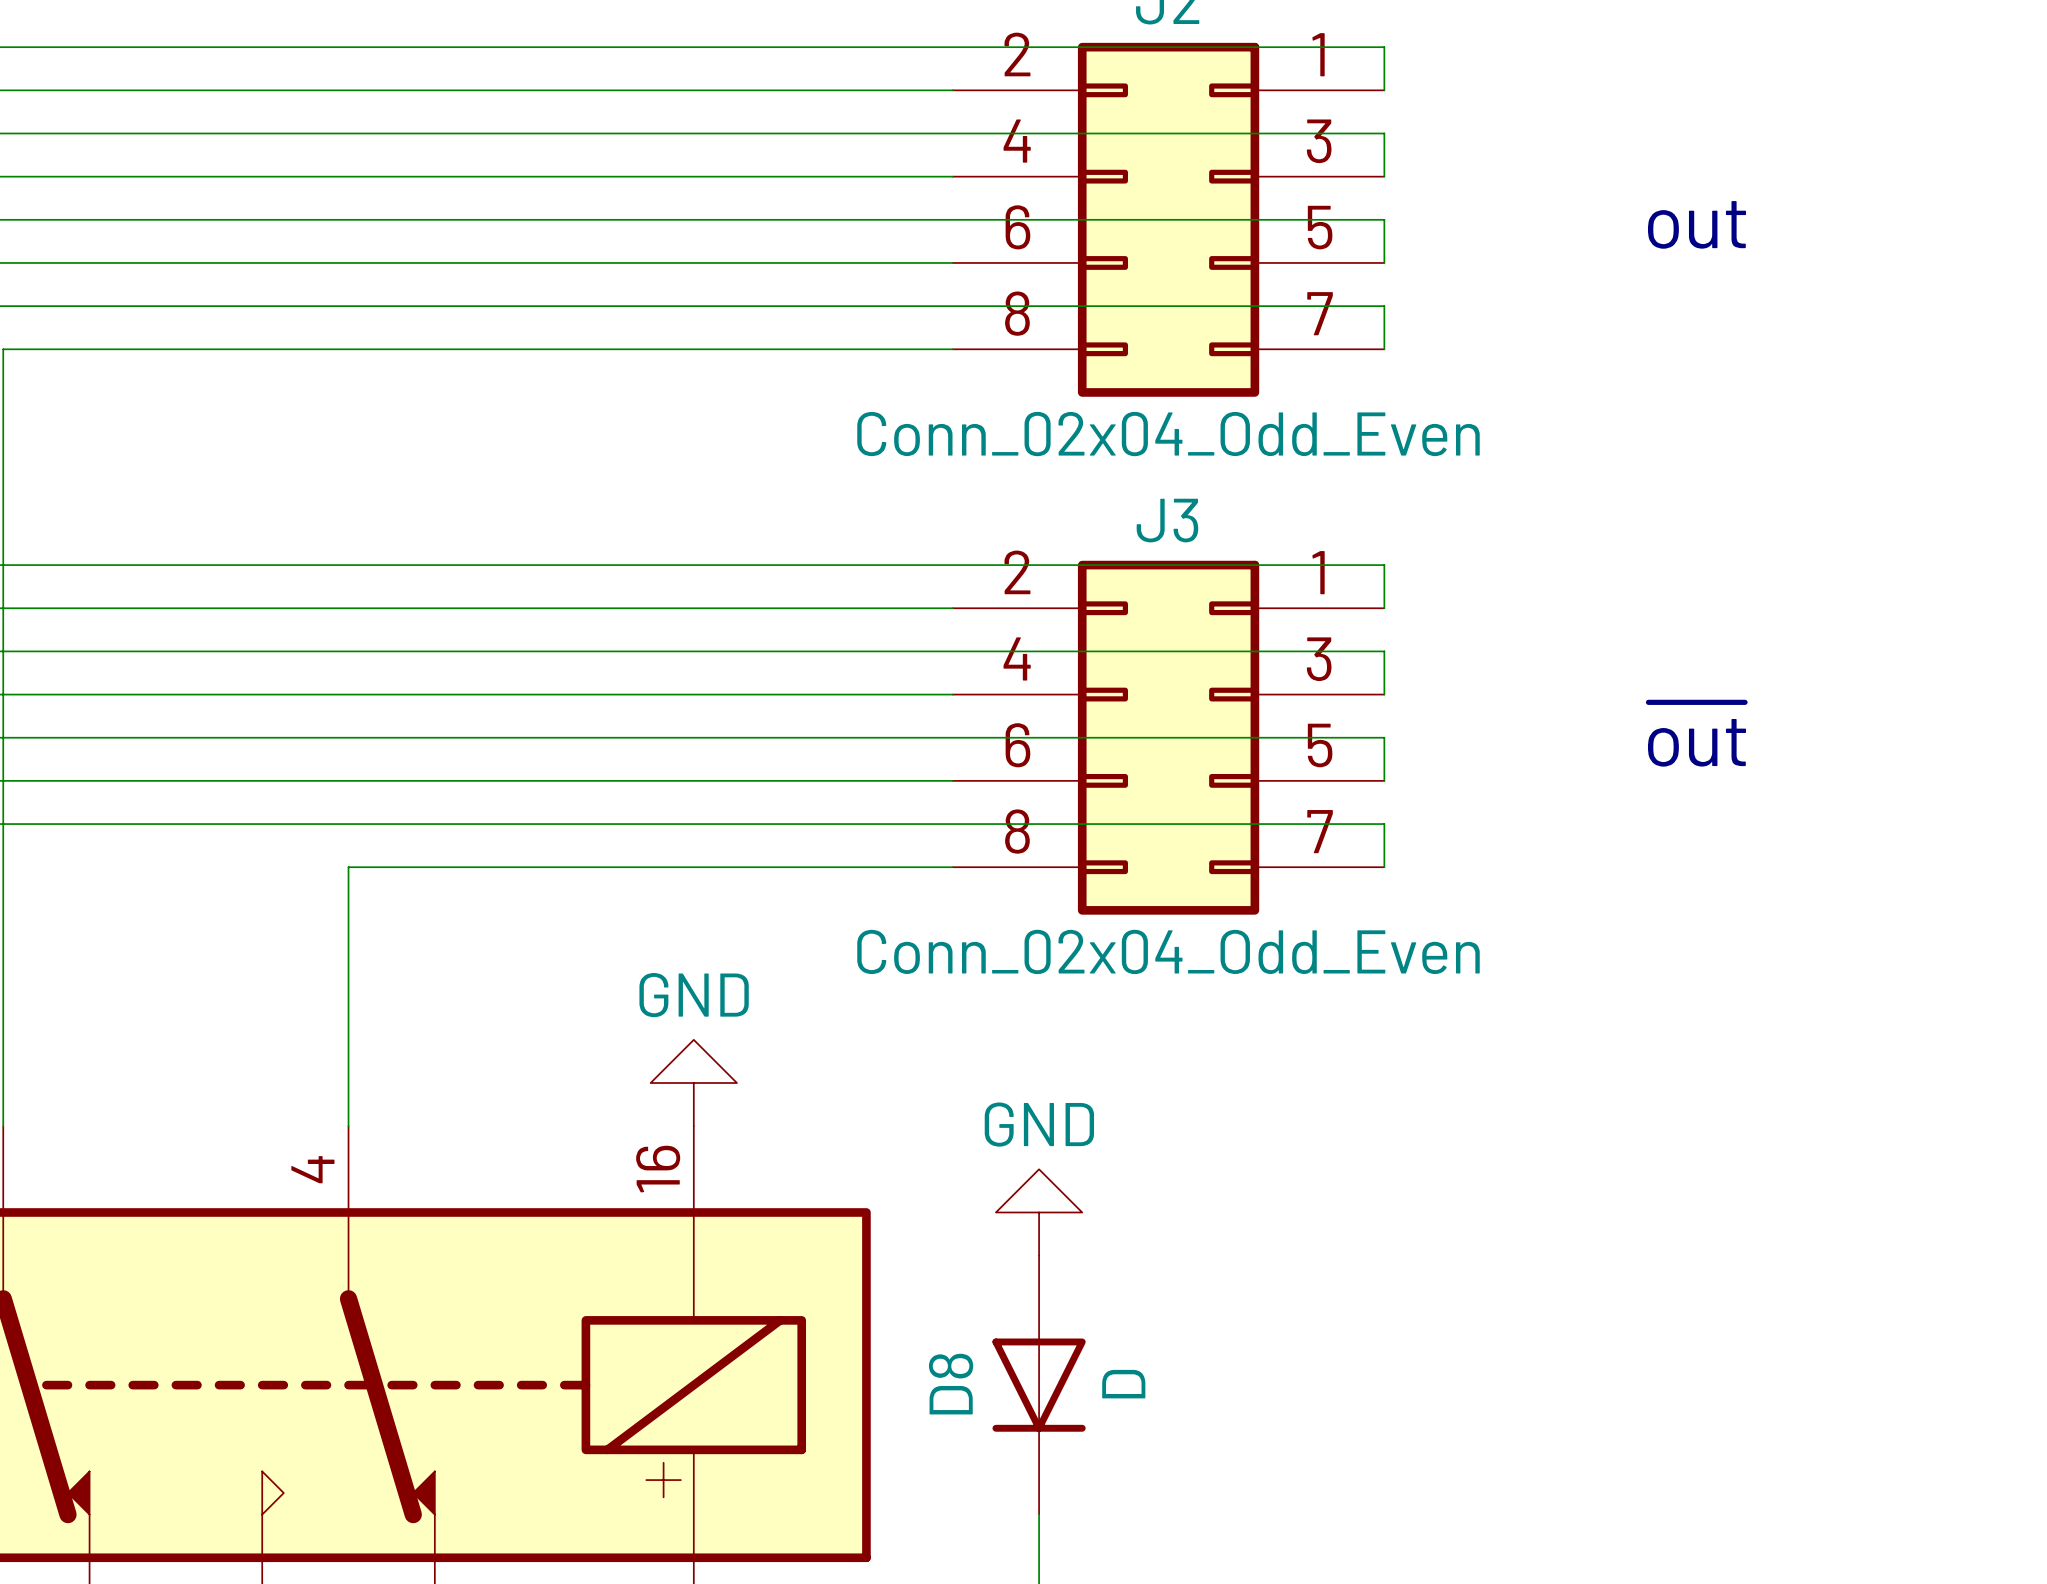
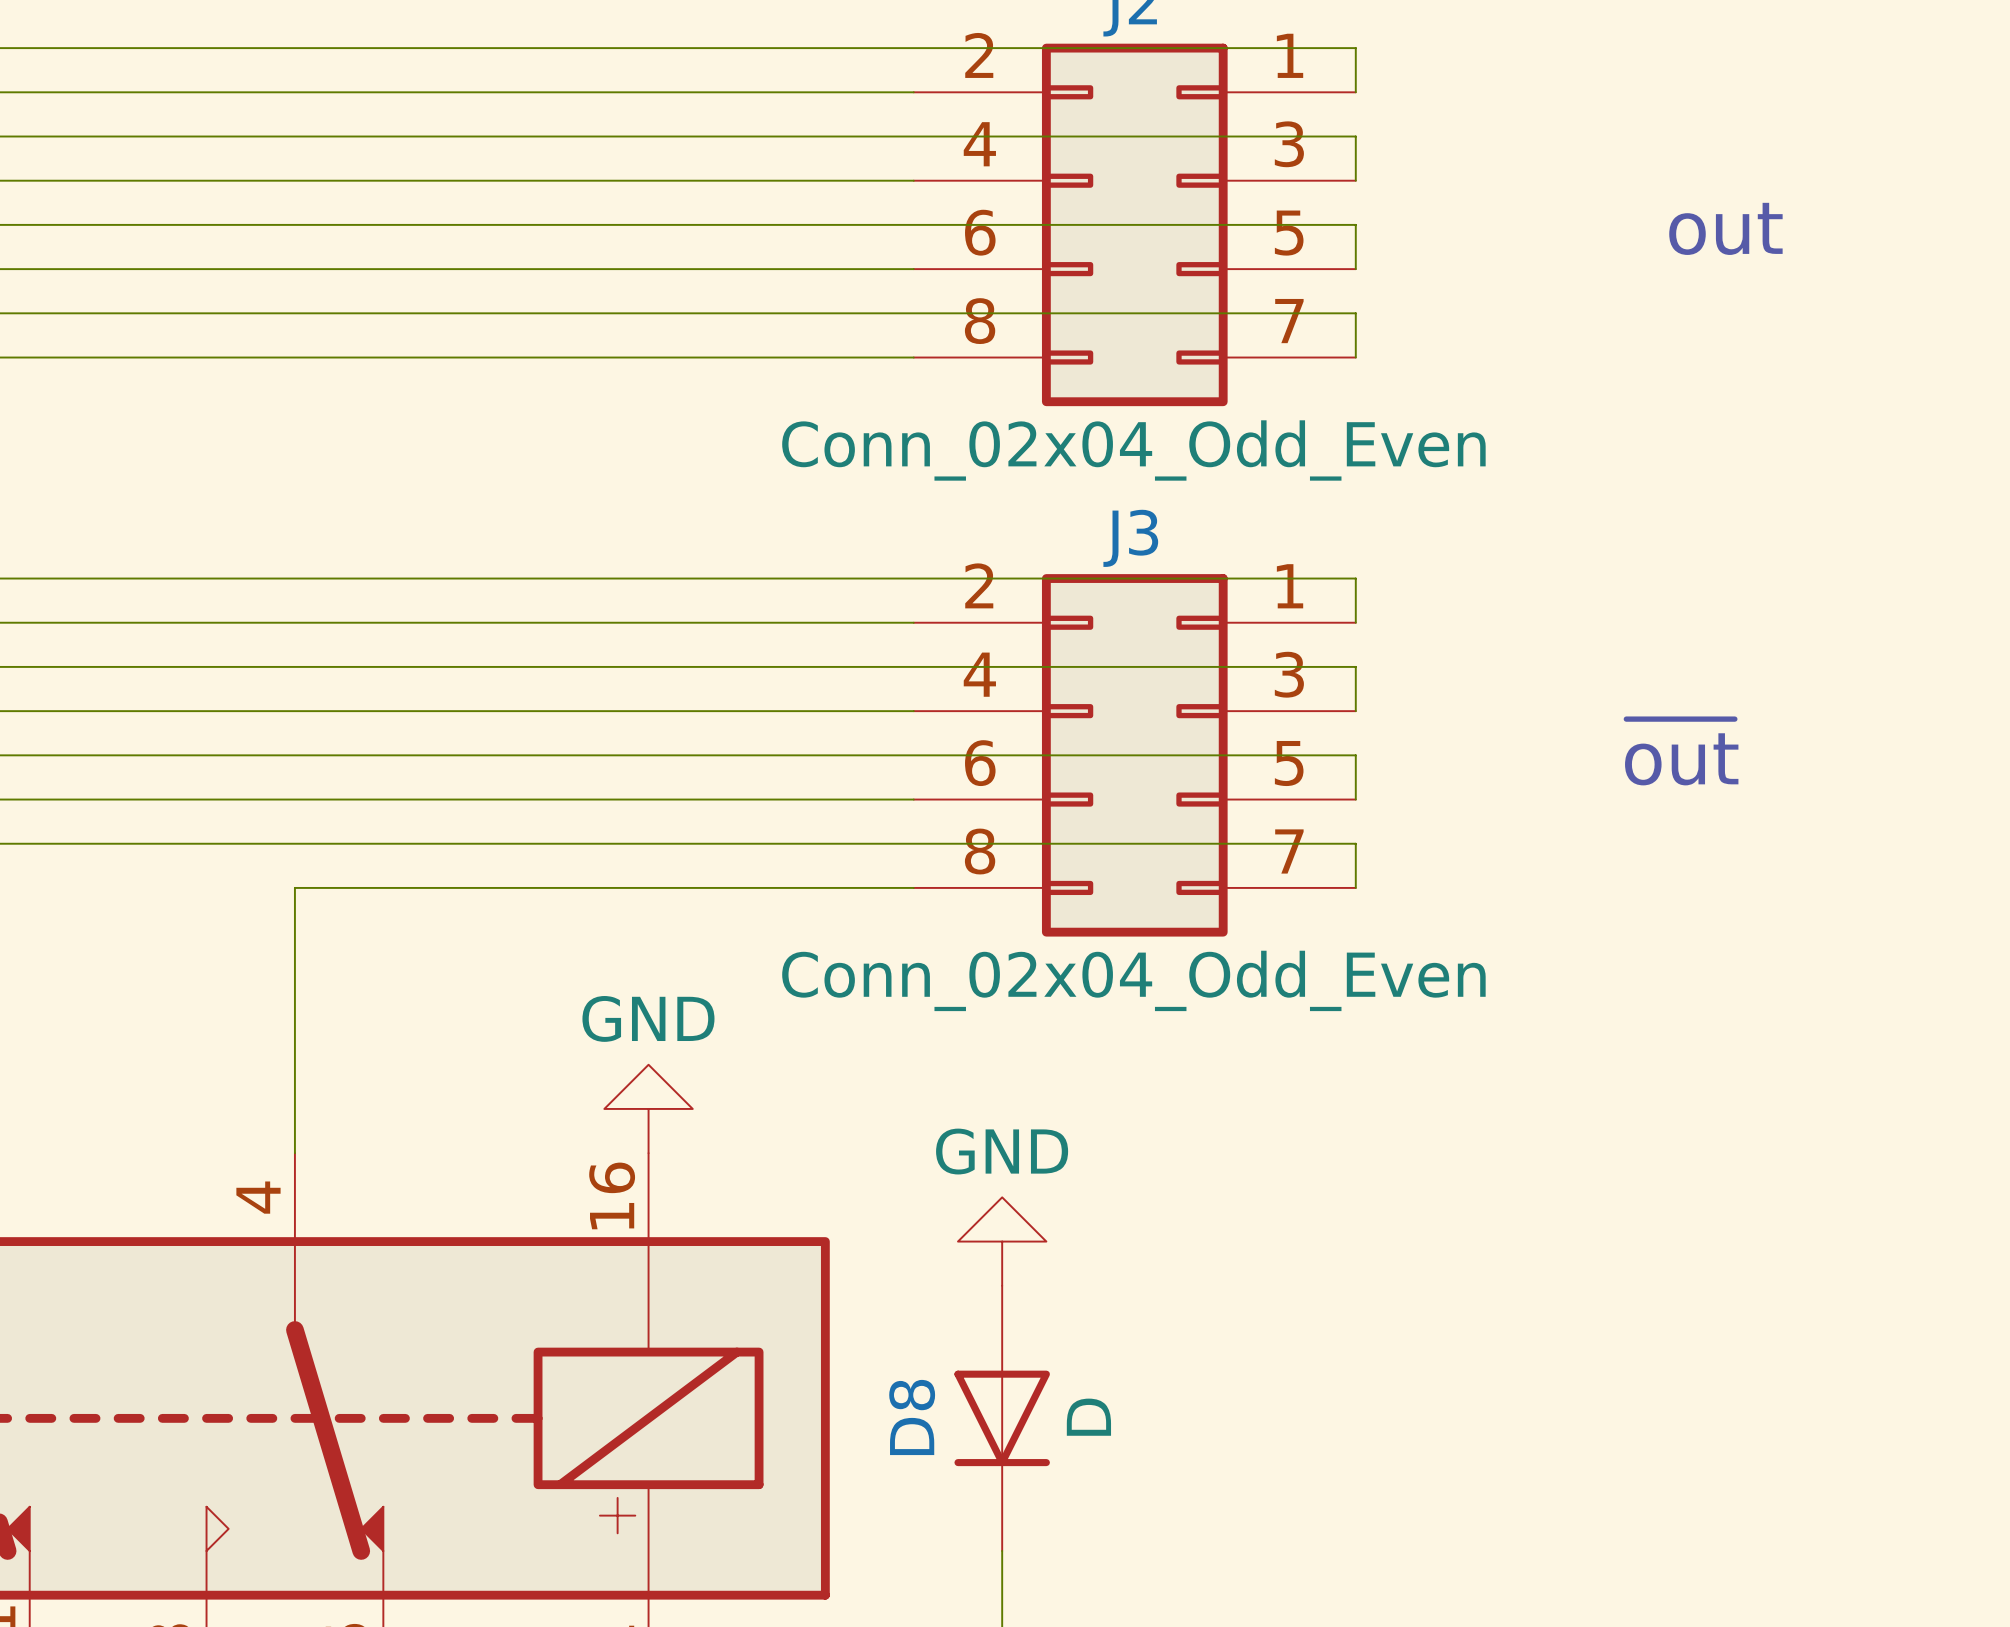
text position: out (1696, 224) -> out (1725, 228)

